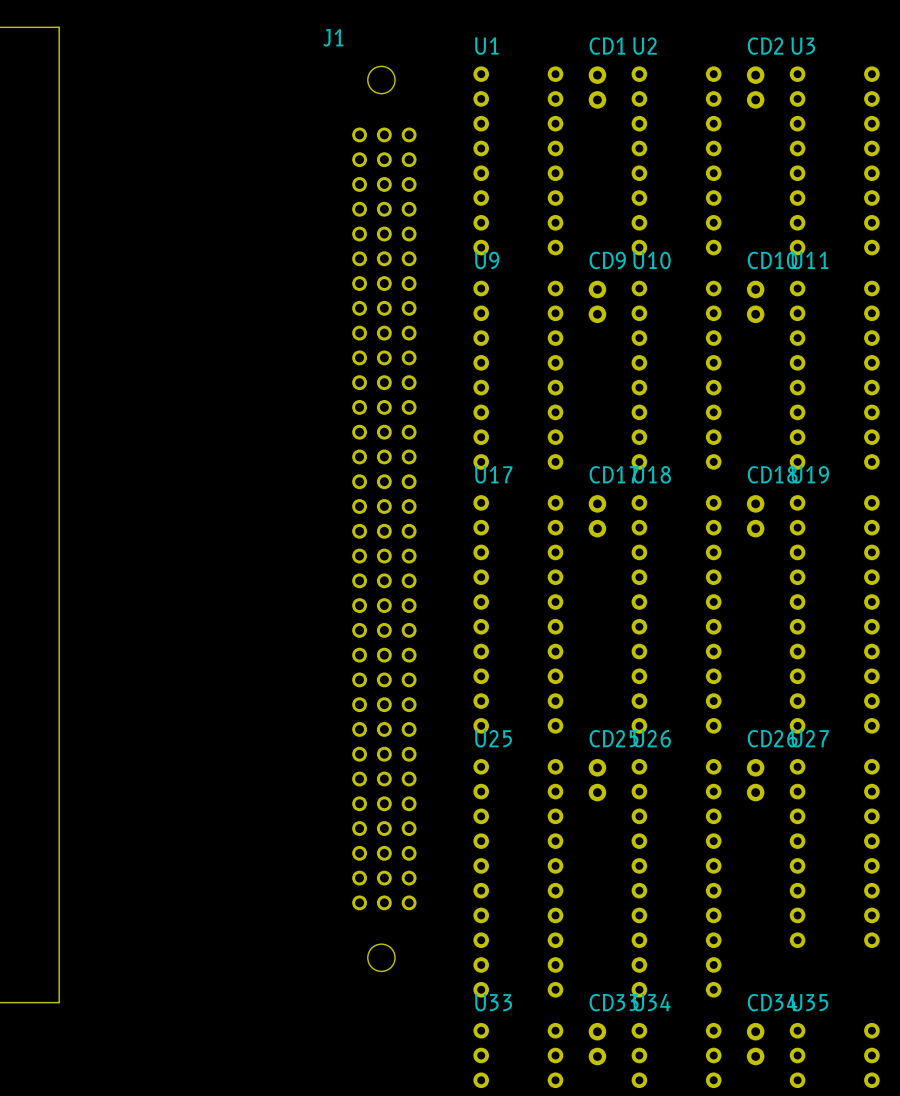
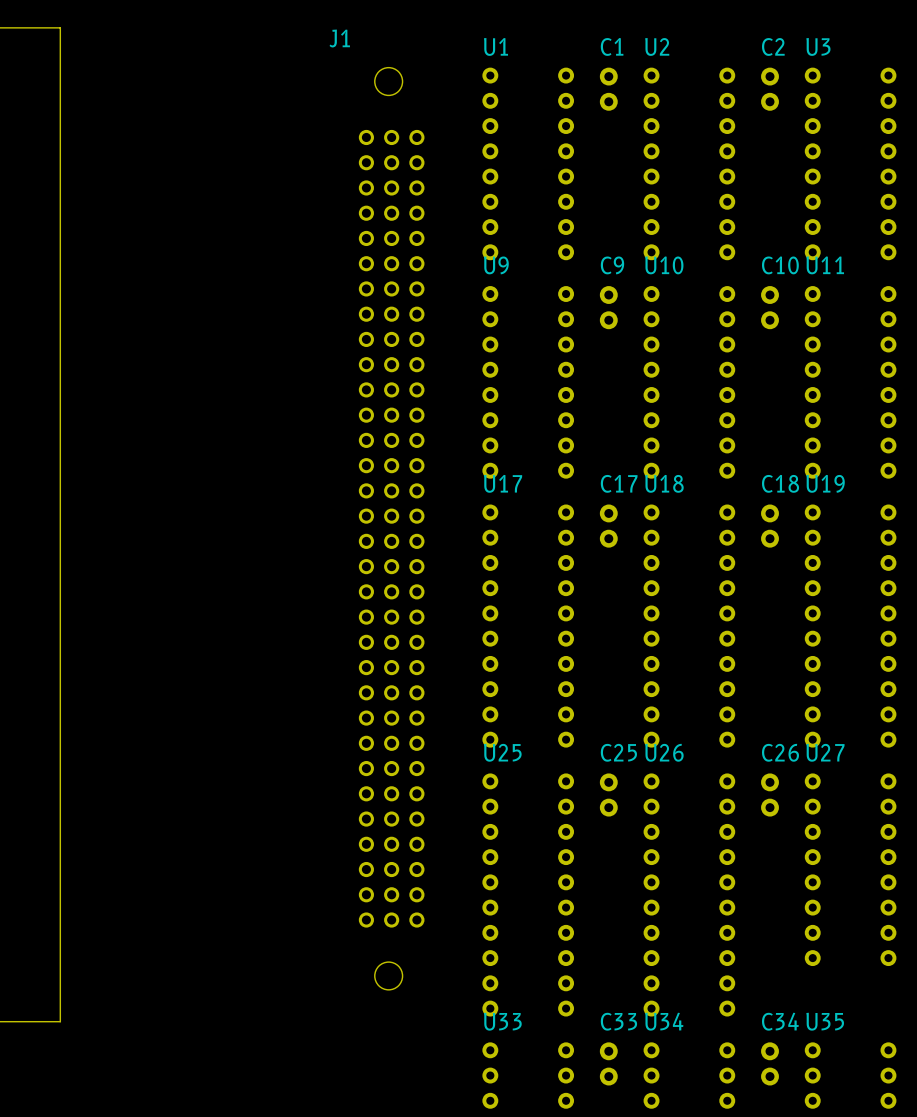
CD1 name: CD1 (607, 46) -> C1 (612, 46)
CD2 name: CD2 (765, 46) -> C2 (773, 46)
CD9 name: CD9 (607, 260) -> C9 (612, 265)
CD10 name: CD10 (772, 260) -> C10 (780, 265)
CD17 name: CD17 (614, 474) -> C17 (619, 483)
CD18 name: CD18 (772, 474) -> C18 (780, 483)
CD25 name: CD25 (614, 738) -> C25 (618, 752)
CD26 name: CD26 (772, 738) -> C26 (780, 752)
CD33 name: CD33 (614, 1002) -> C33 (618, 1021)
CD34 name: CD34 (772, 1002) -> C34 (780, 1021)

